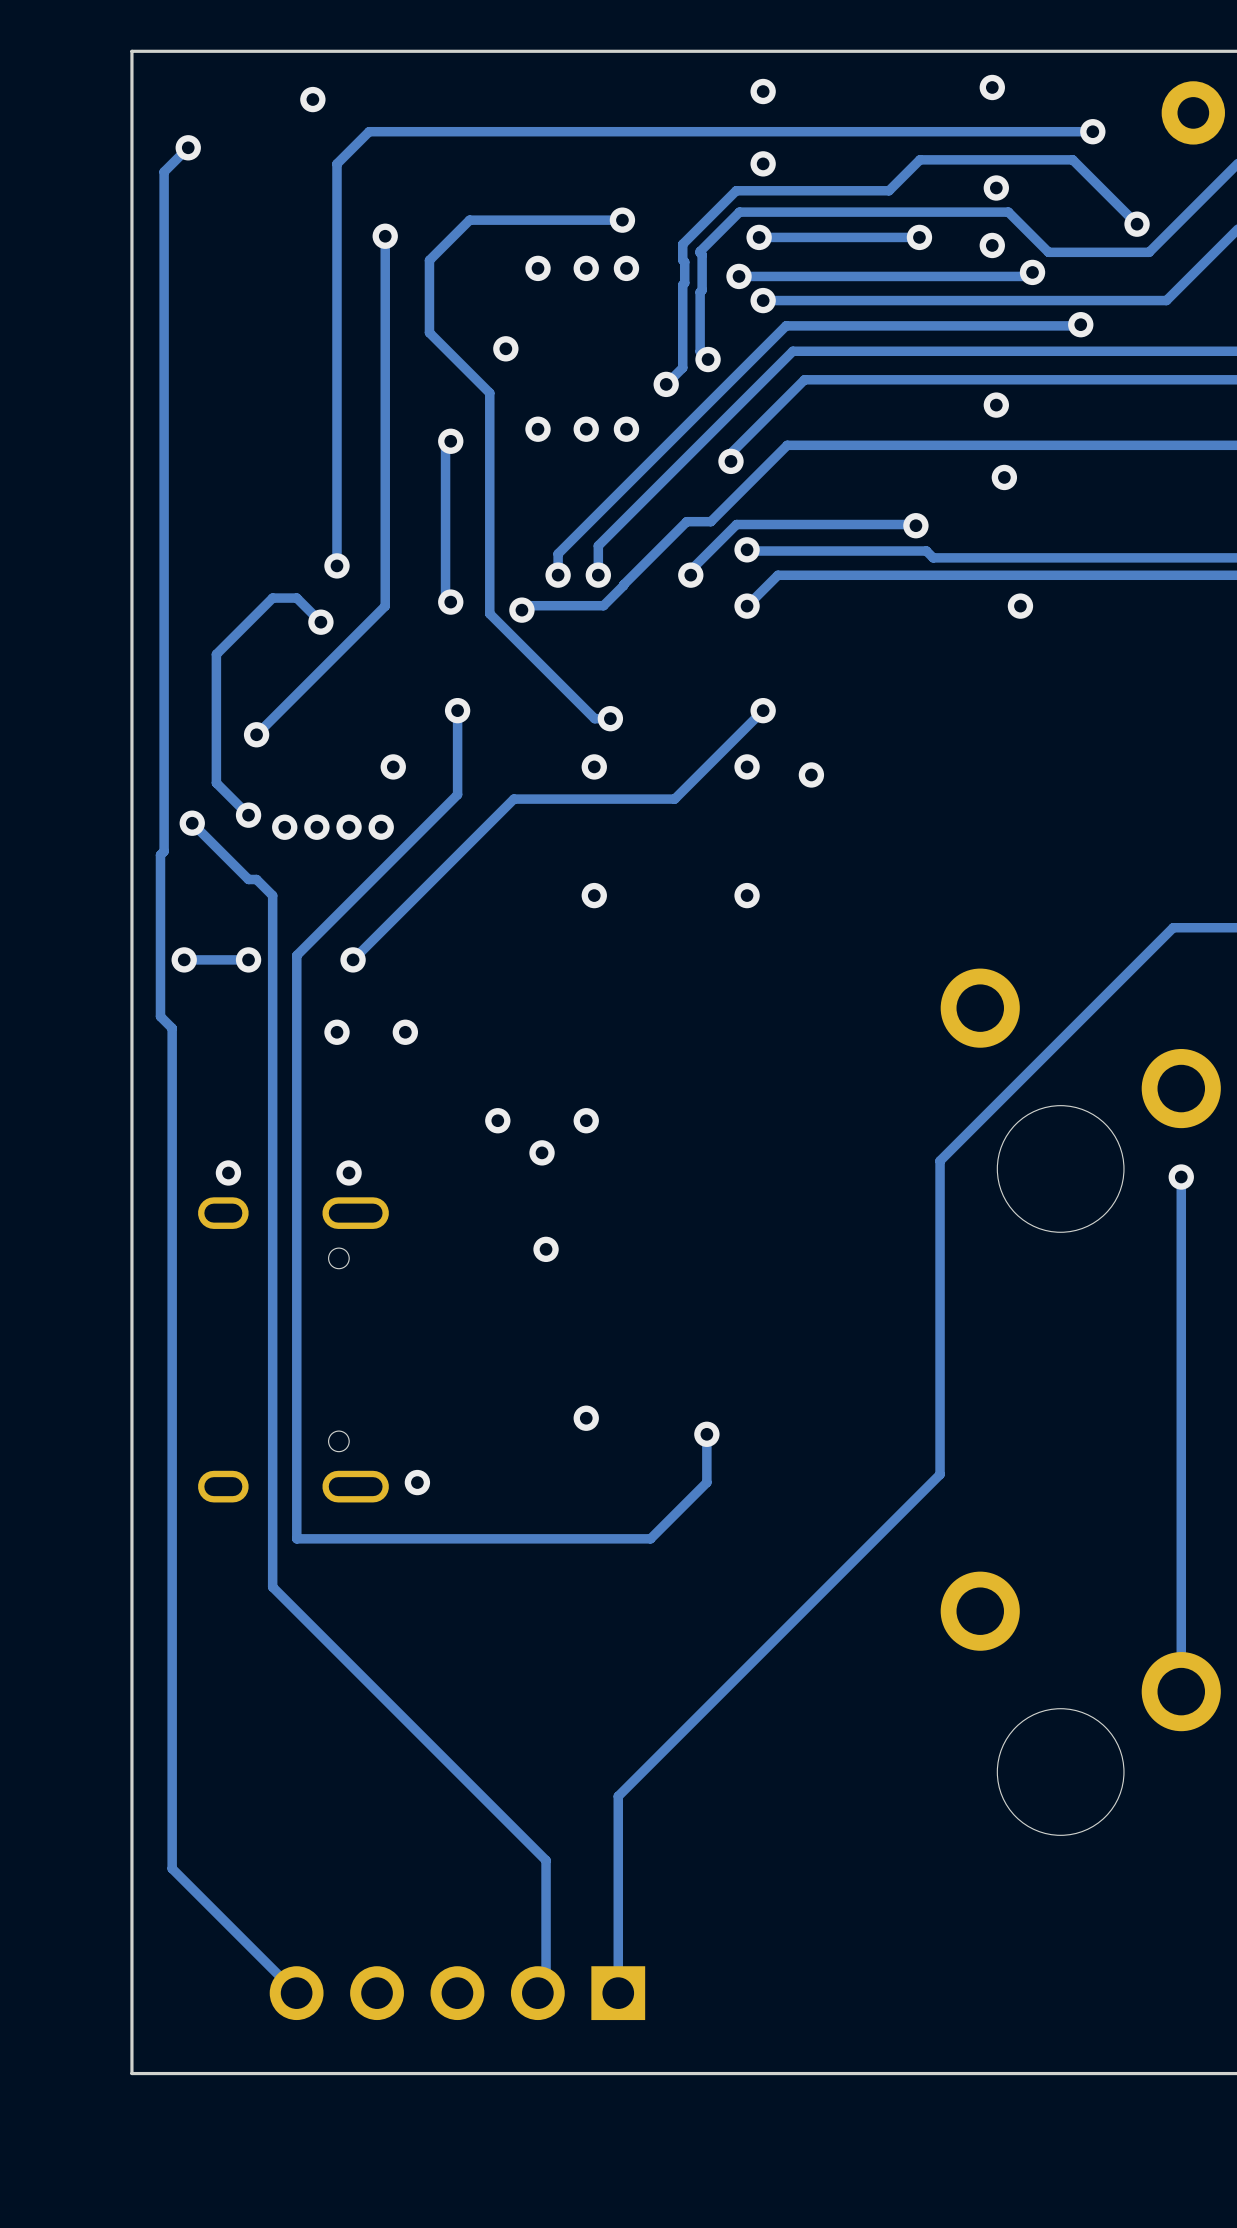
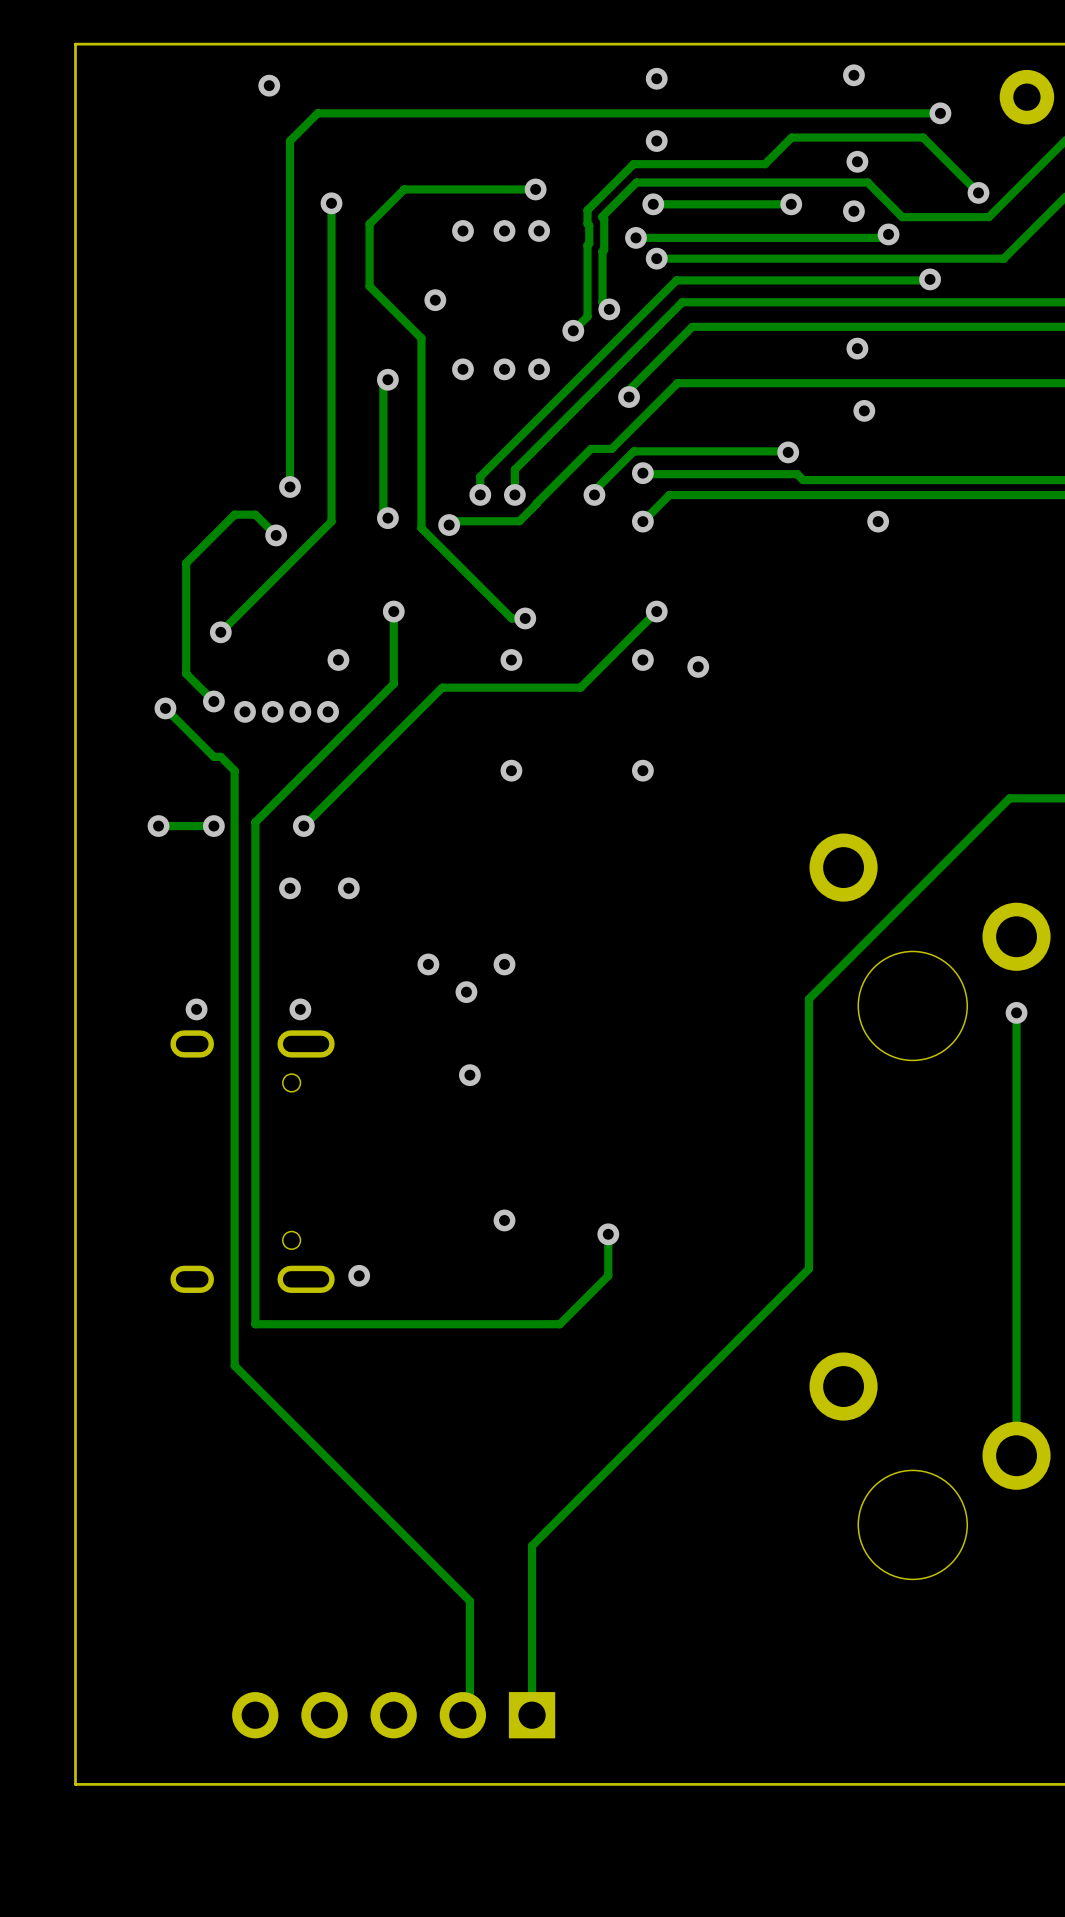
board edge: (131, 51) (131, 2073) -> (113, 44) (75, 44) (75, 1784) (113, 1784)
track: (188, 147) (164, 171) (164, 851) (160, 854) (160, 1016) (172, 1028) (172, 1868) (296, 1993) -> none
via: (188, 147) -> none

